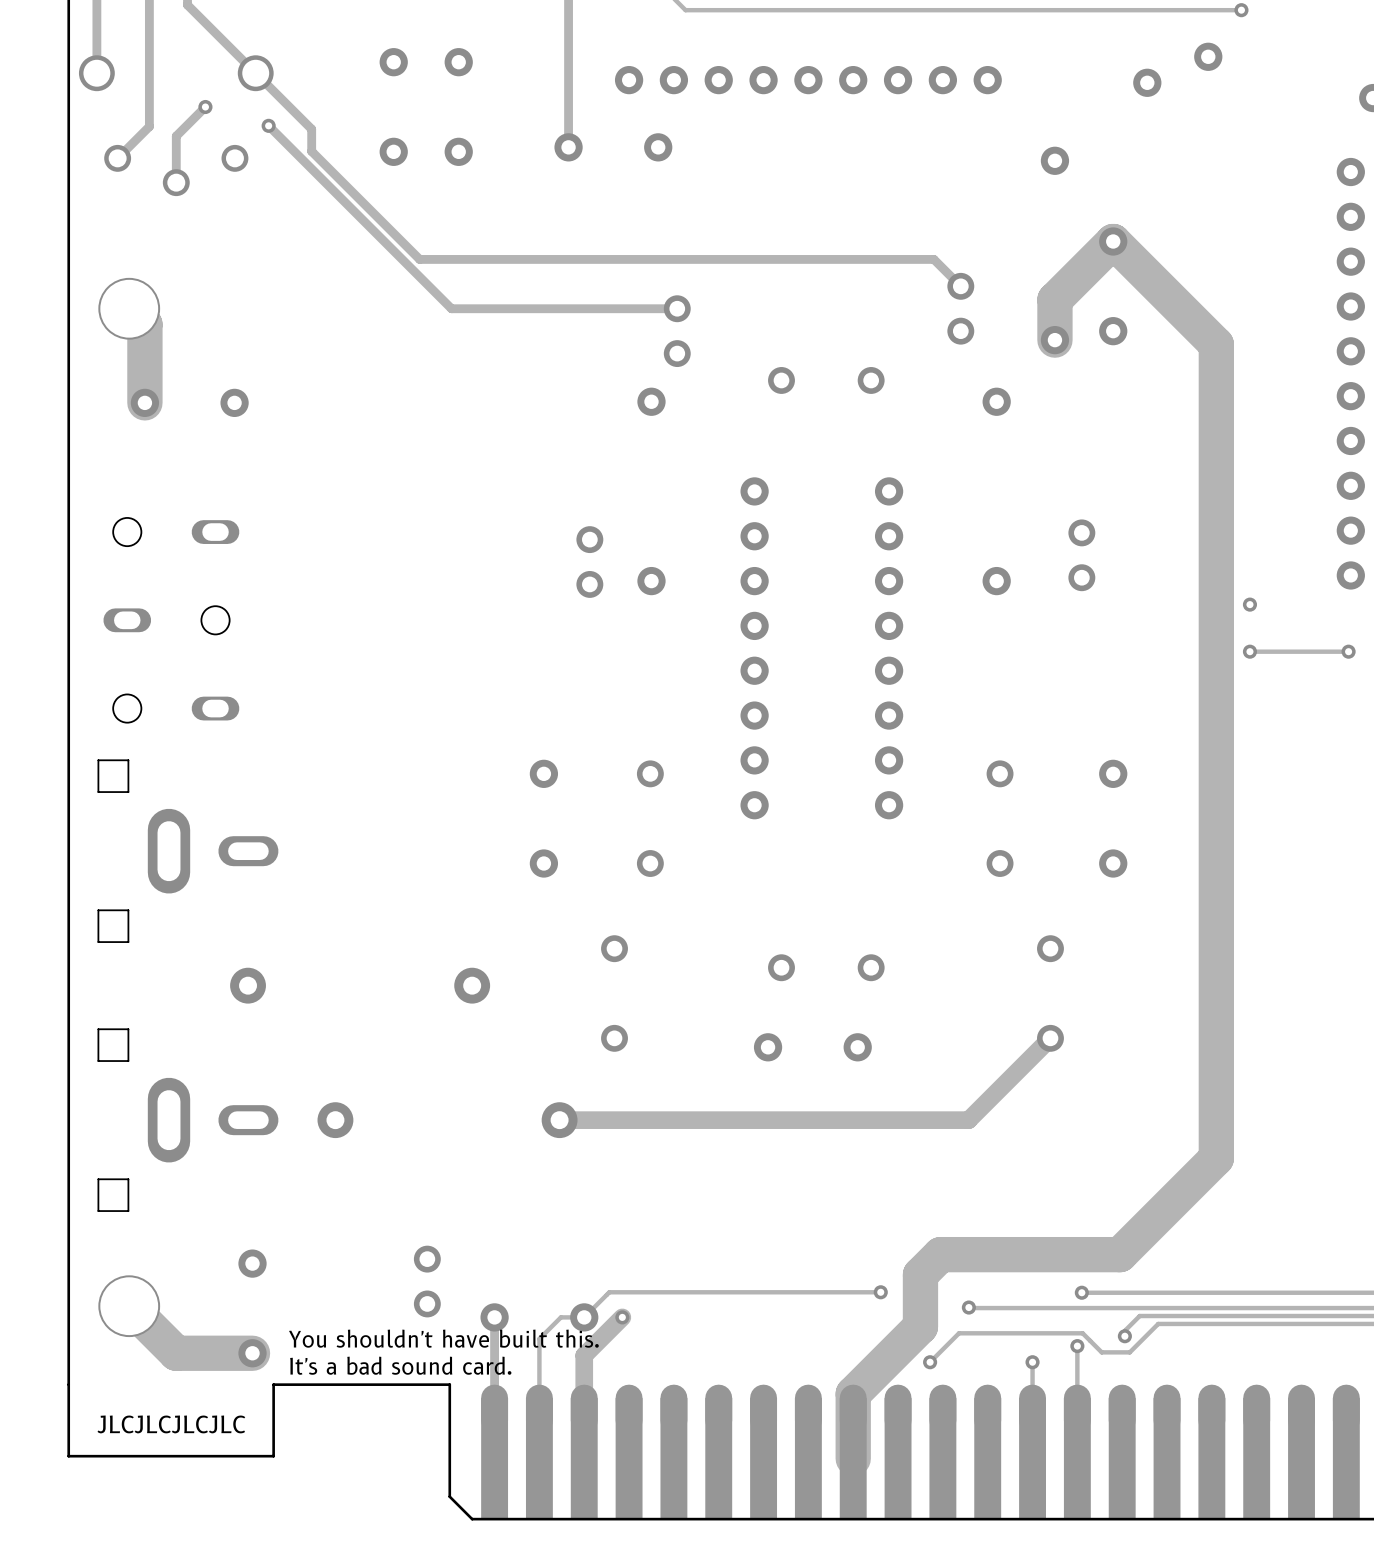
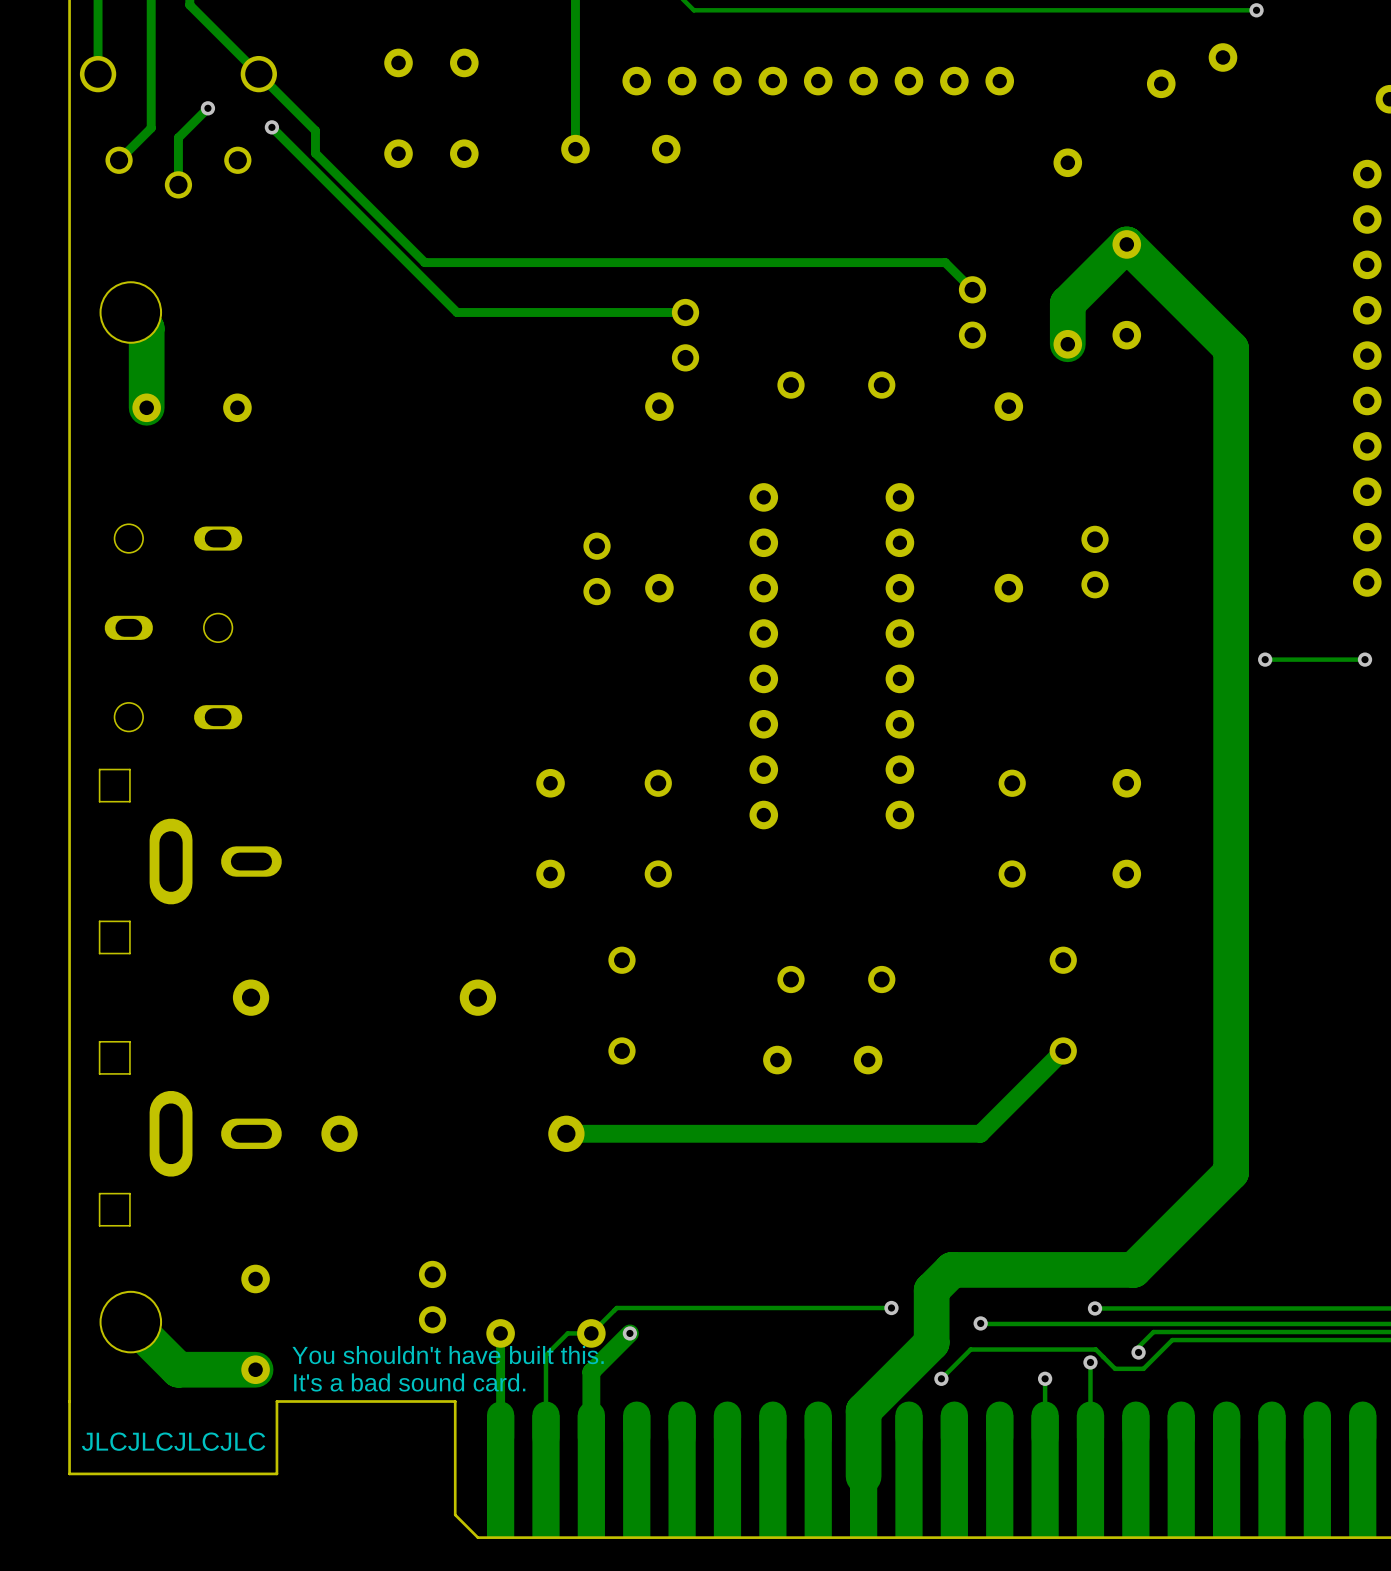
via: (1249, 604) -> none

